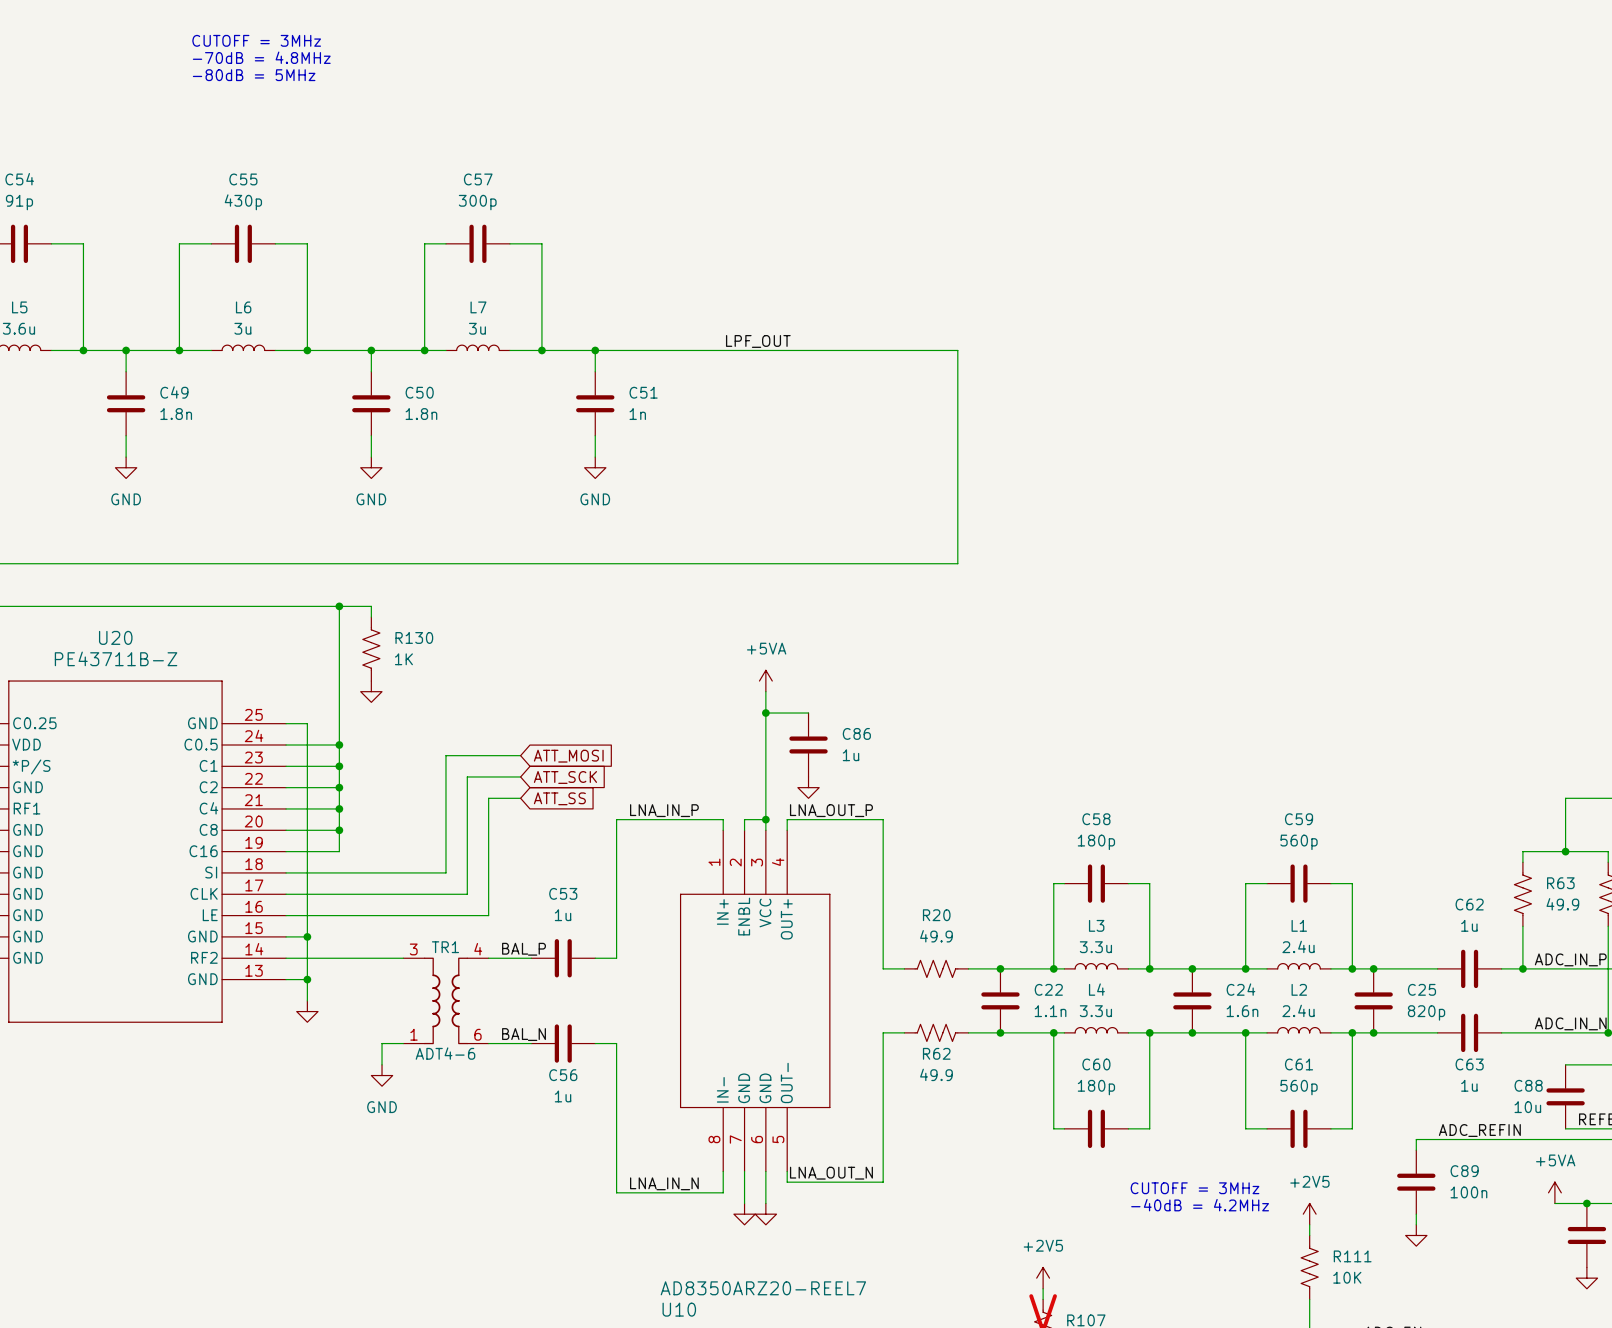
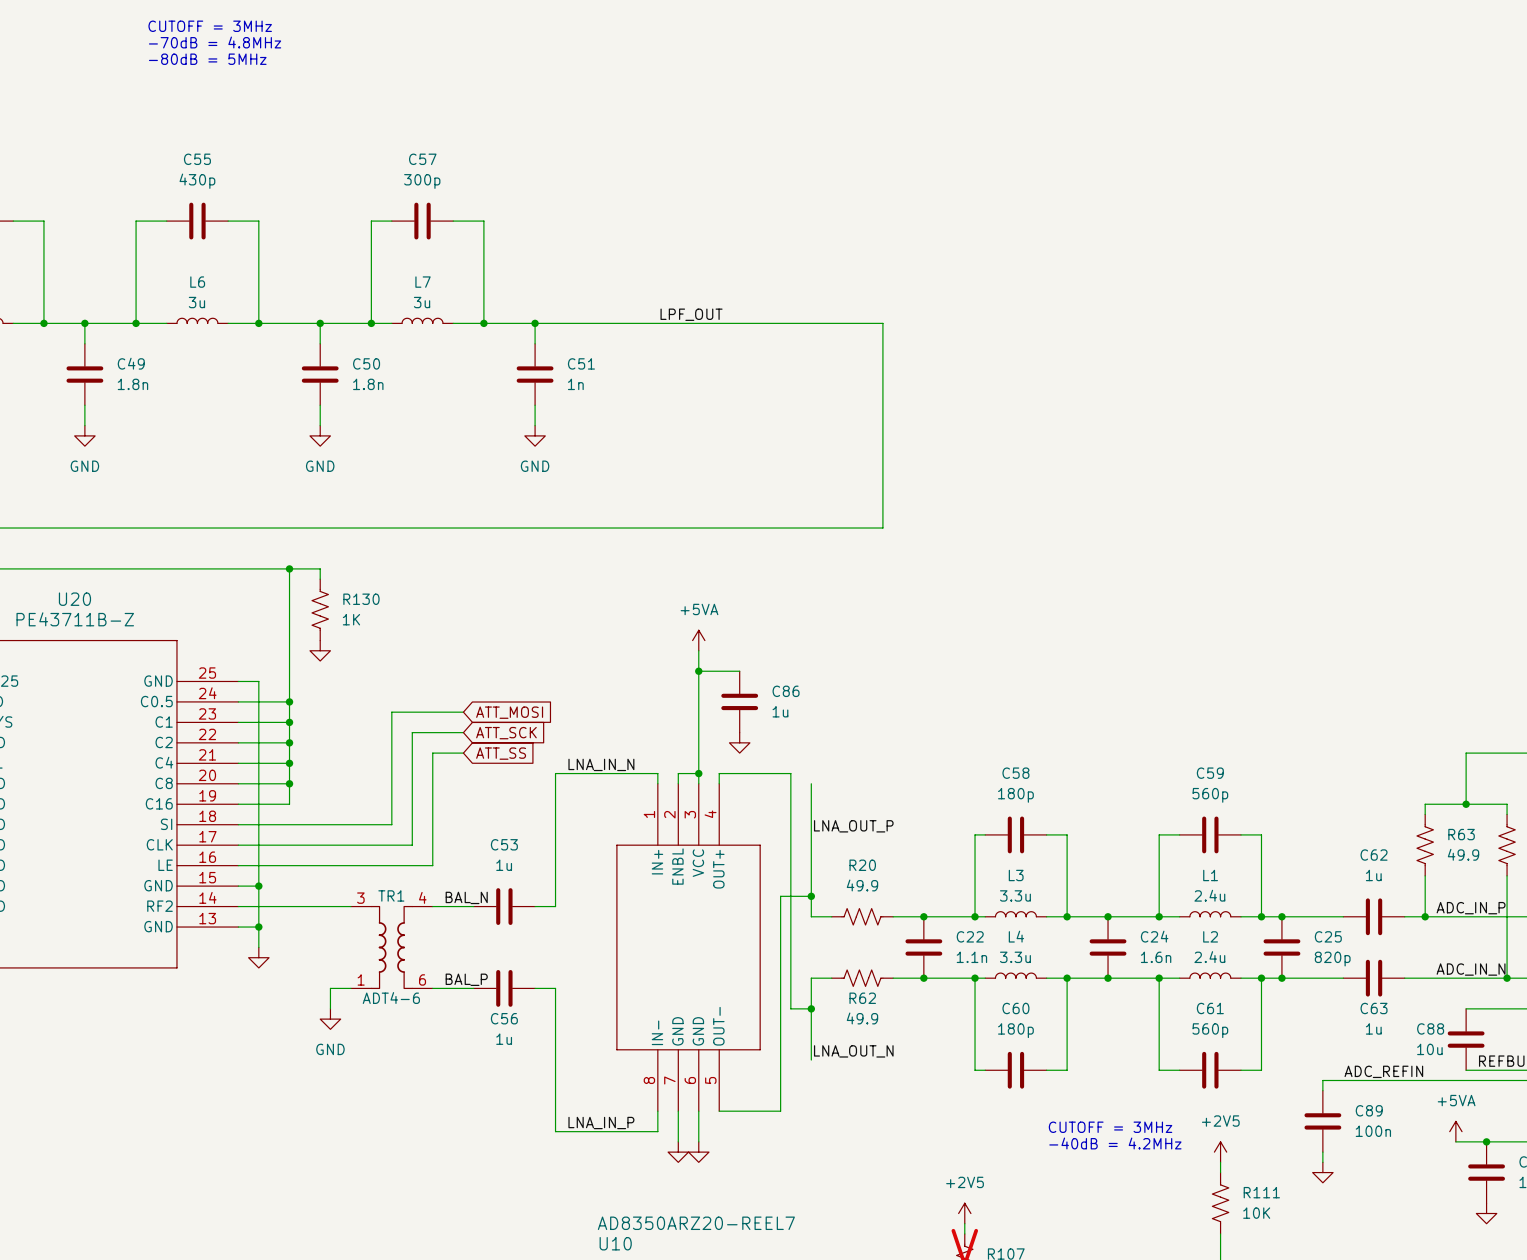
label: LNA_IN_P (664, 810) -> LNA_IN_N (601, 764)
label position: LNA_OUT_P (831, 810) -> LNA_OUT_P (853, 826)
wire: (861, 819) (883, 819) (883, 830) -> (790, 773) (790, 1008) (811, 1008)
junction: none -> (811, 896)
label: BAL_P (524, 949) -> BAL_N (466, 897)
label: BAL_N (524, 1034) -> BAL_P (466, 979)
junction: none -> (811, 1008)
wire: (883, 1118) (883, 1182) (787, 1182) (787, 1171) -> (811, 896) (780, 896) (780, 1111) (719, 1111)
label position: LNA_OUT_N (831, 1173) -> LNA_OUT_N (853, 1051)
label: LNA_IN_N (664, 1183) -> LNA_IN_P (601, 1123)

